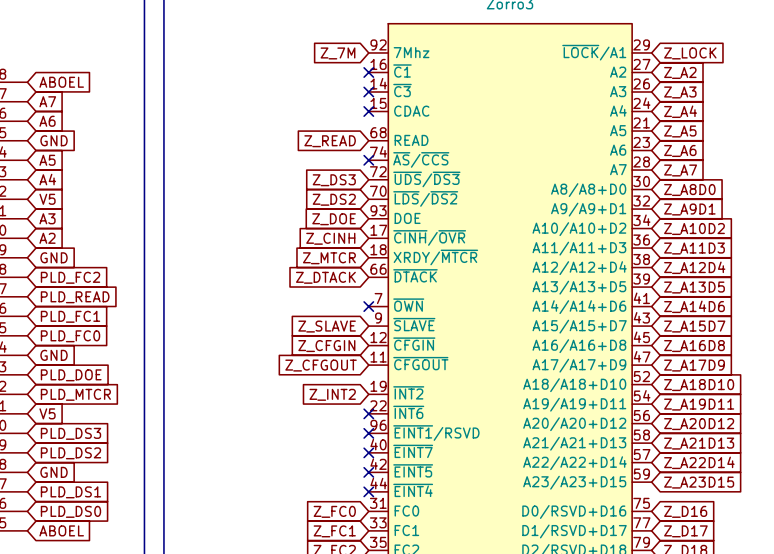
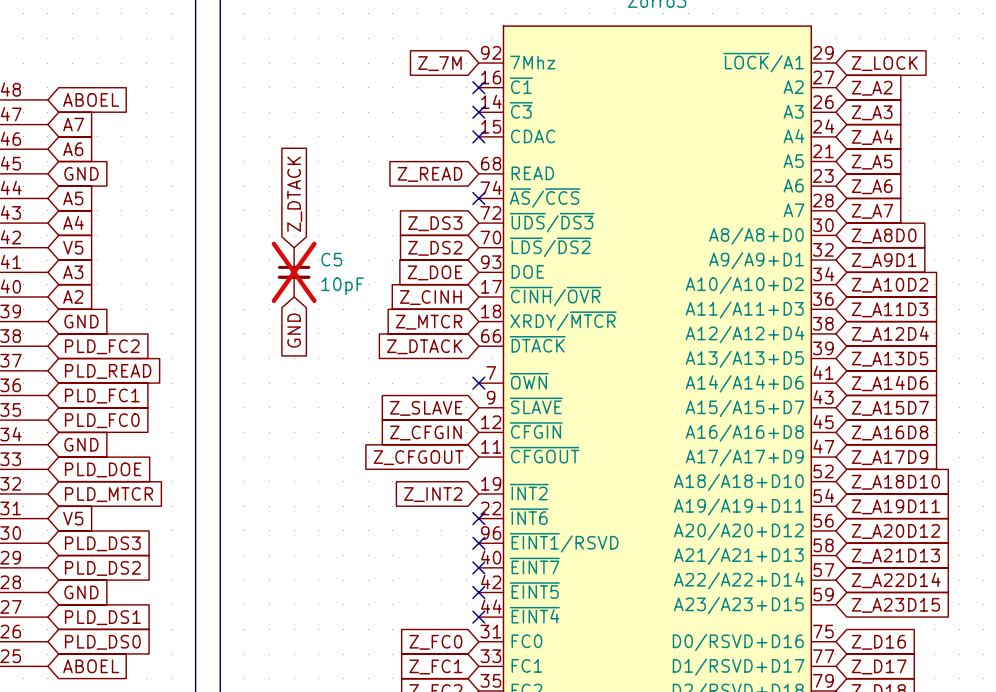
global label: none -> Z_DTACK (294, 194)
C5: none -> 10pF (294, 272)
global label: none -> GND (294, 330)

